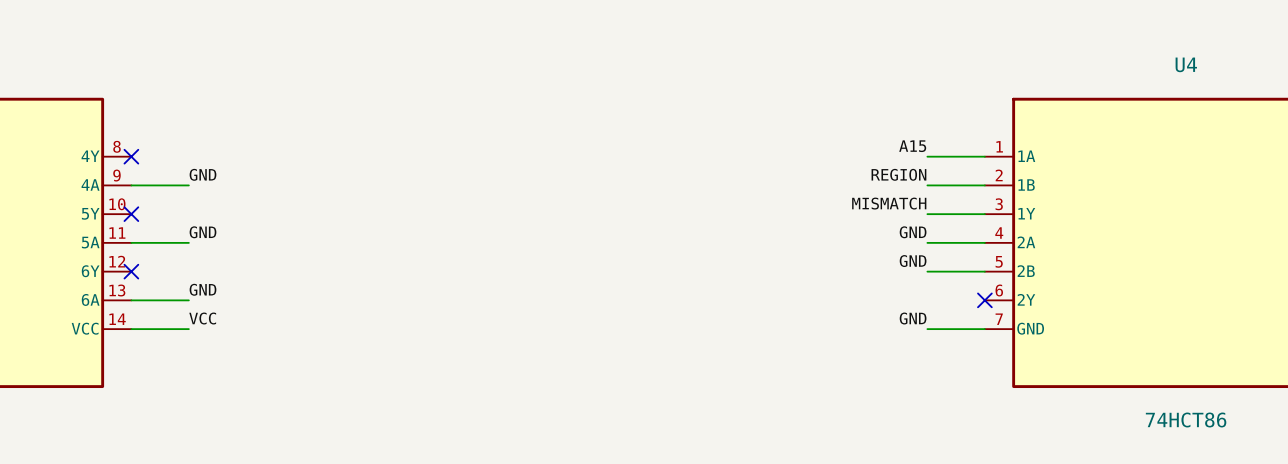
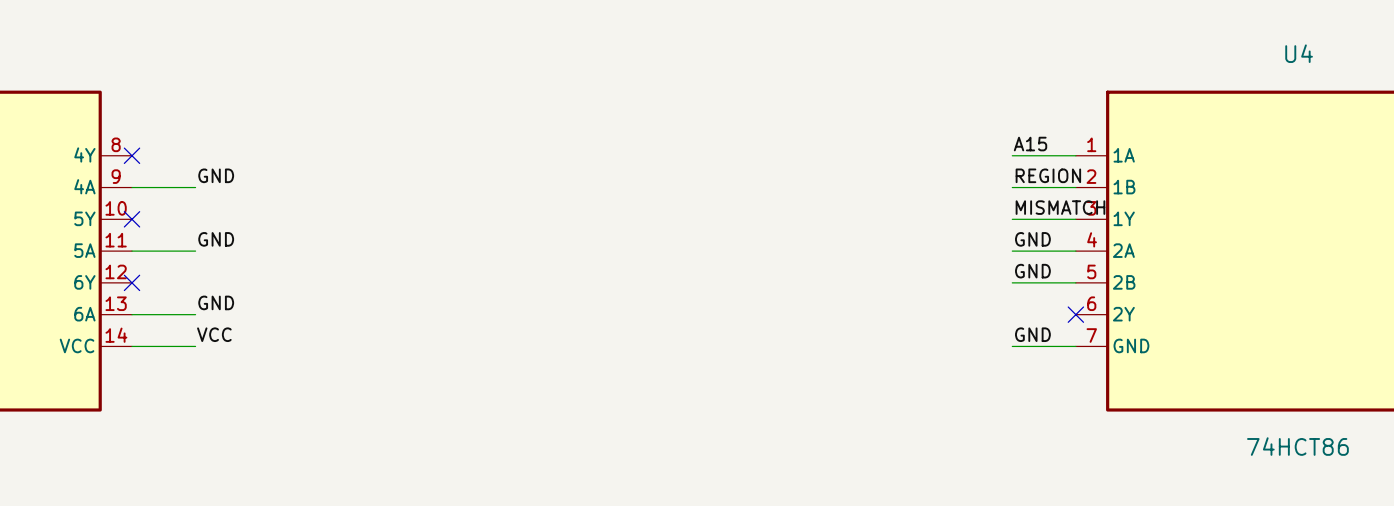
label position: A15 (912, 146) -> A15 (1030, 144)
label position: REGION (898, 174) -> REGION (1048, 175)
label position: MISMATCH (889, 203) -> MISMATCH (1060, 207)
label position: GND (913, 232) -> GND (1032, 239)
label position: GND (913, 261) -> GND (1032, 271)
label position: GND (913, 318) -> GND (1032, 334)

